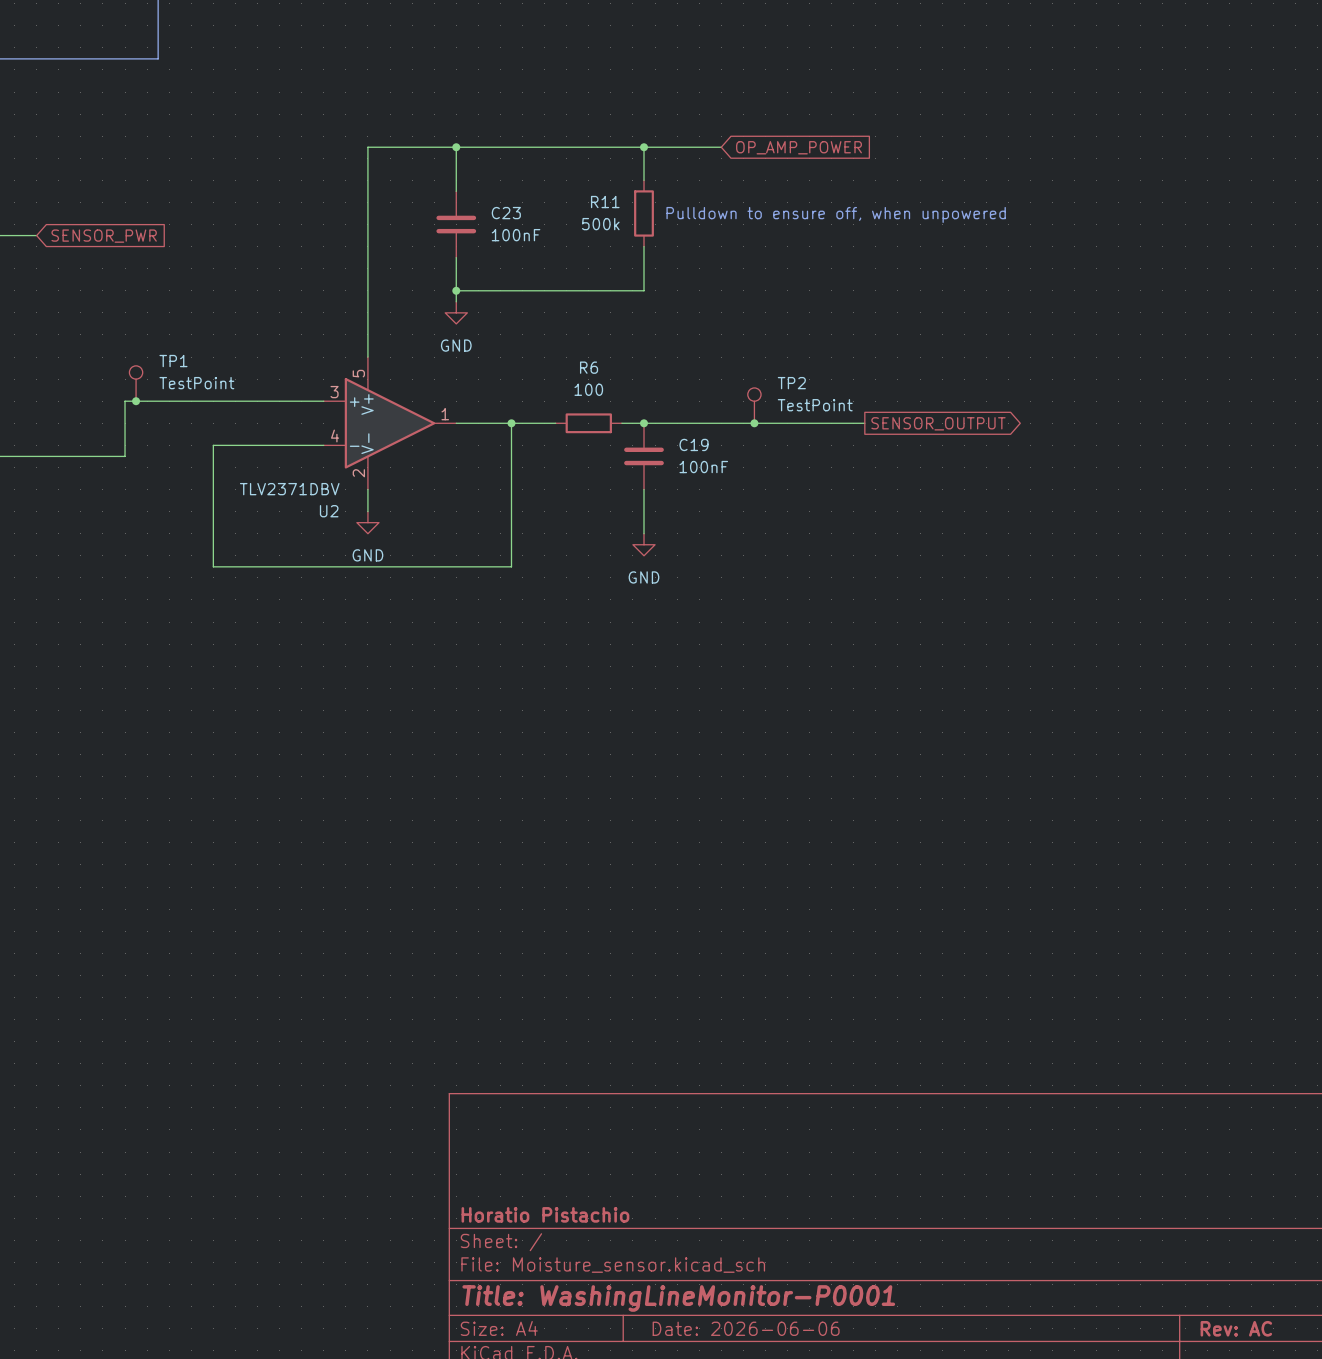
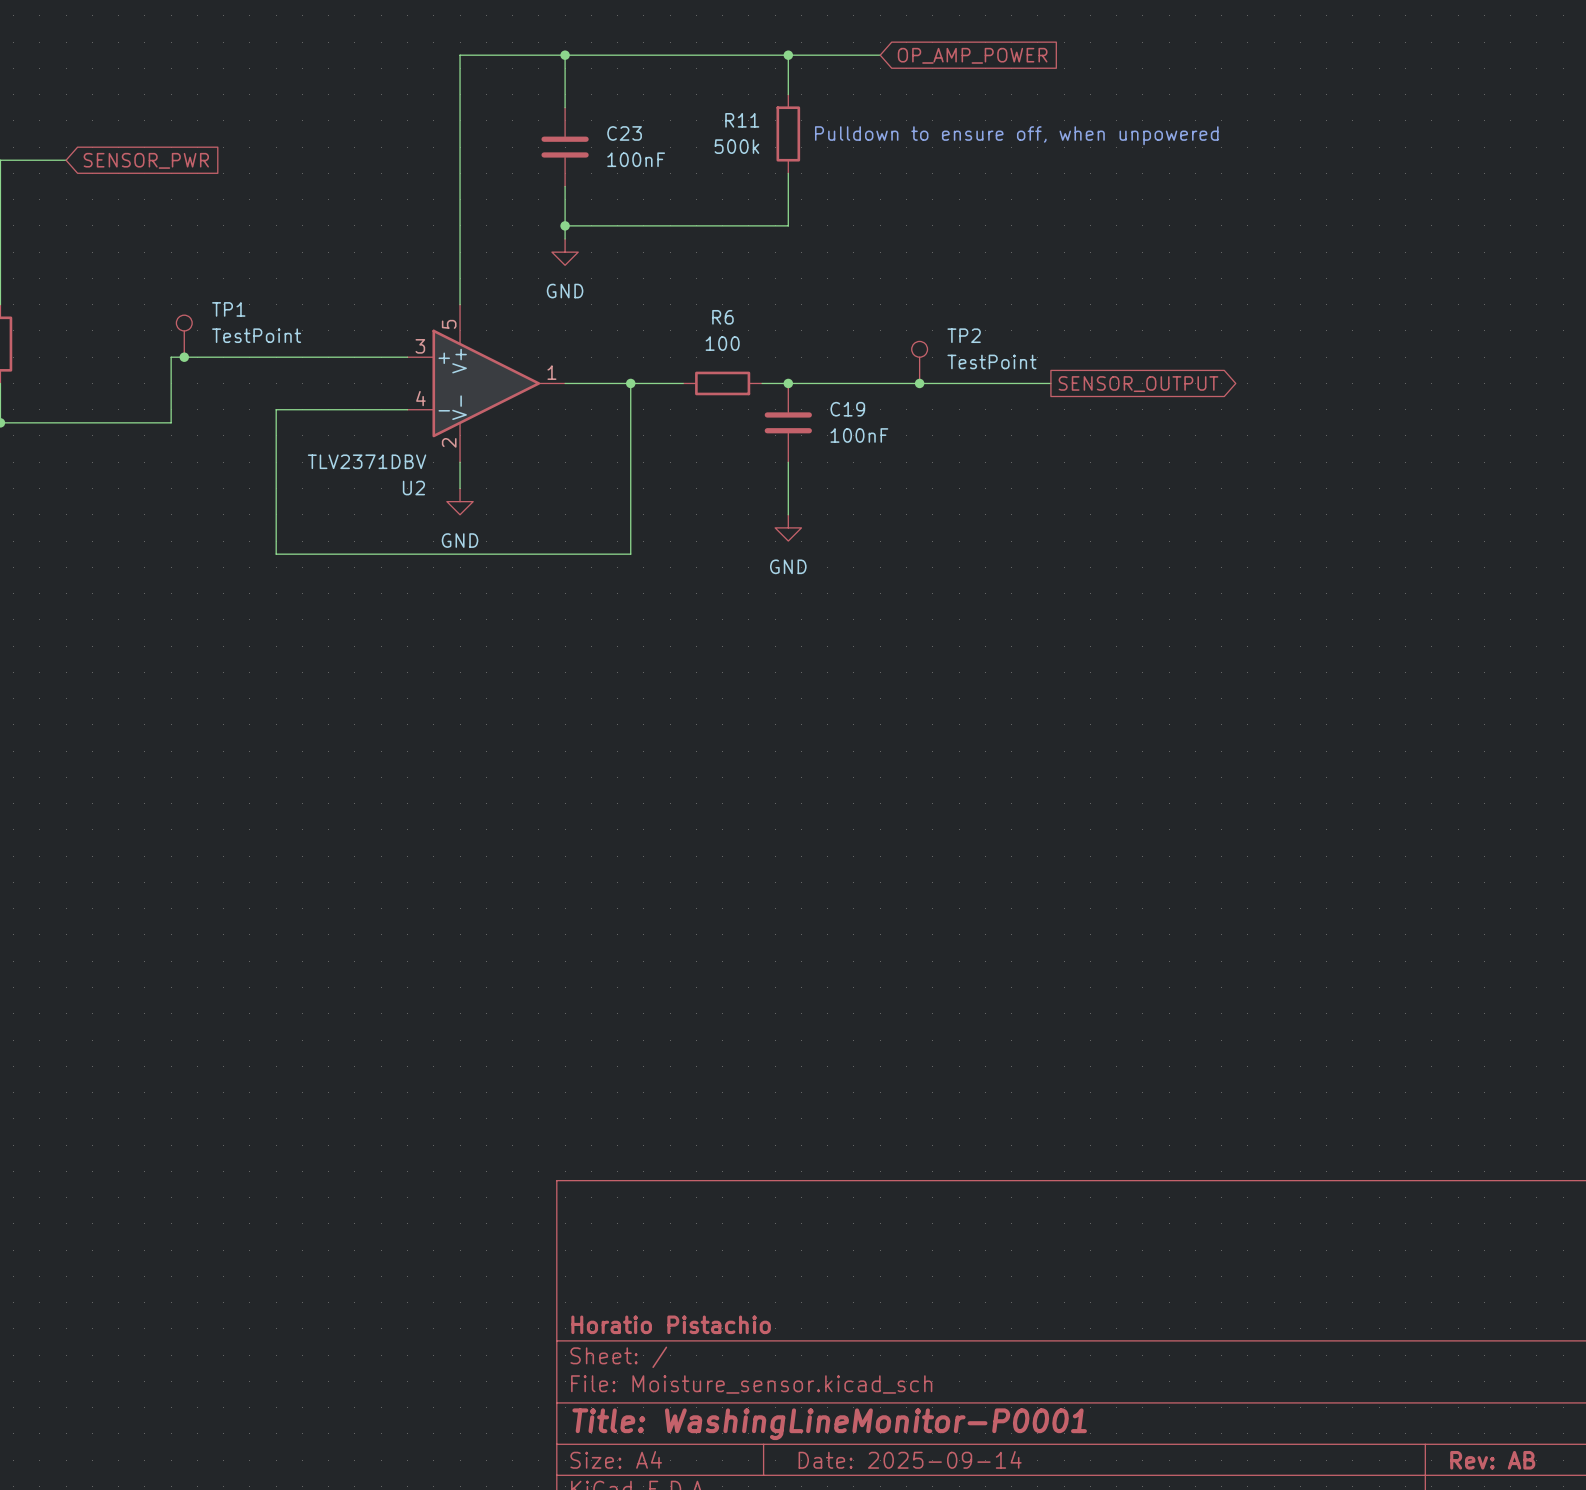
title block: Date: 2026-06-06 (746, 1328) -> Date: 2025-09-14 (910, 1459)
title block: Rev: AC (1236, 1328) -> Rev: AB (1492, 1460)

